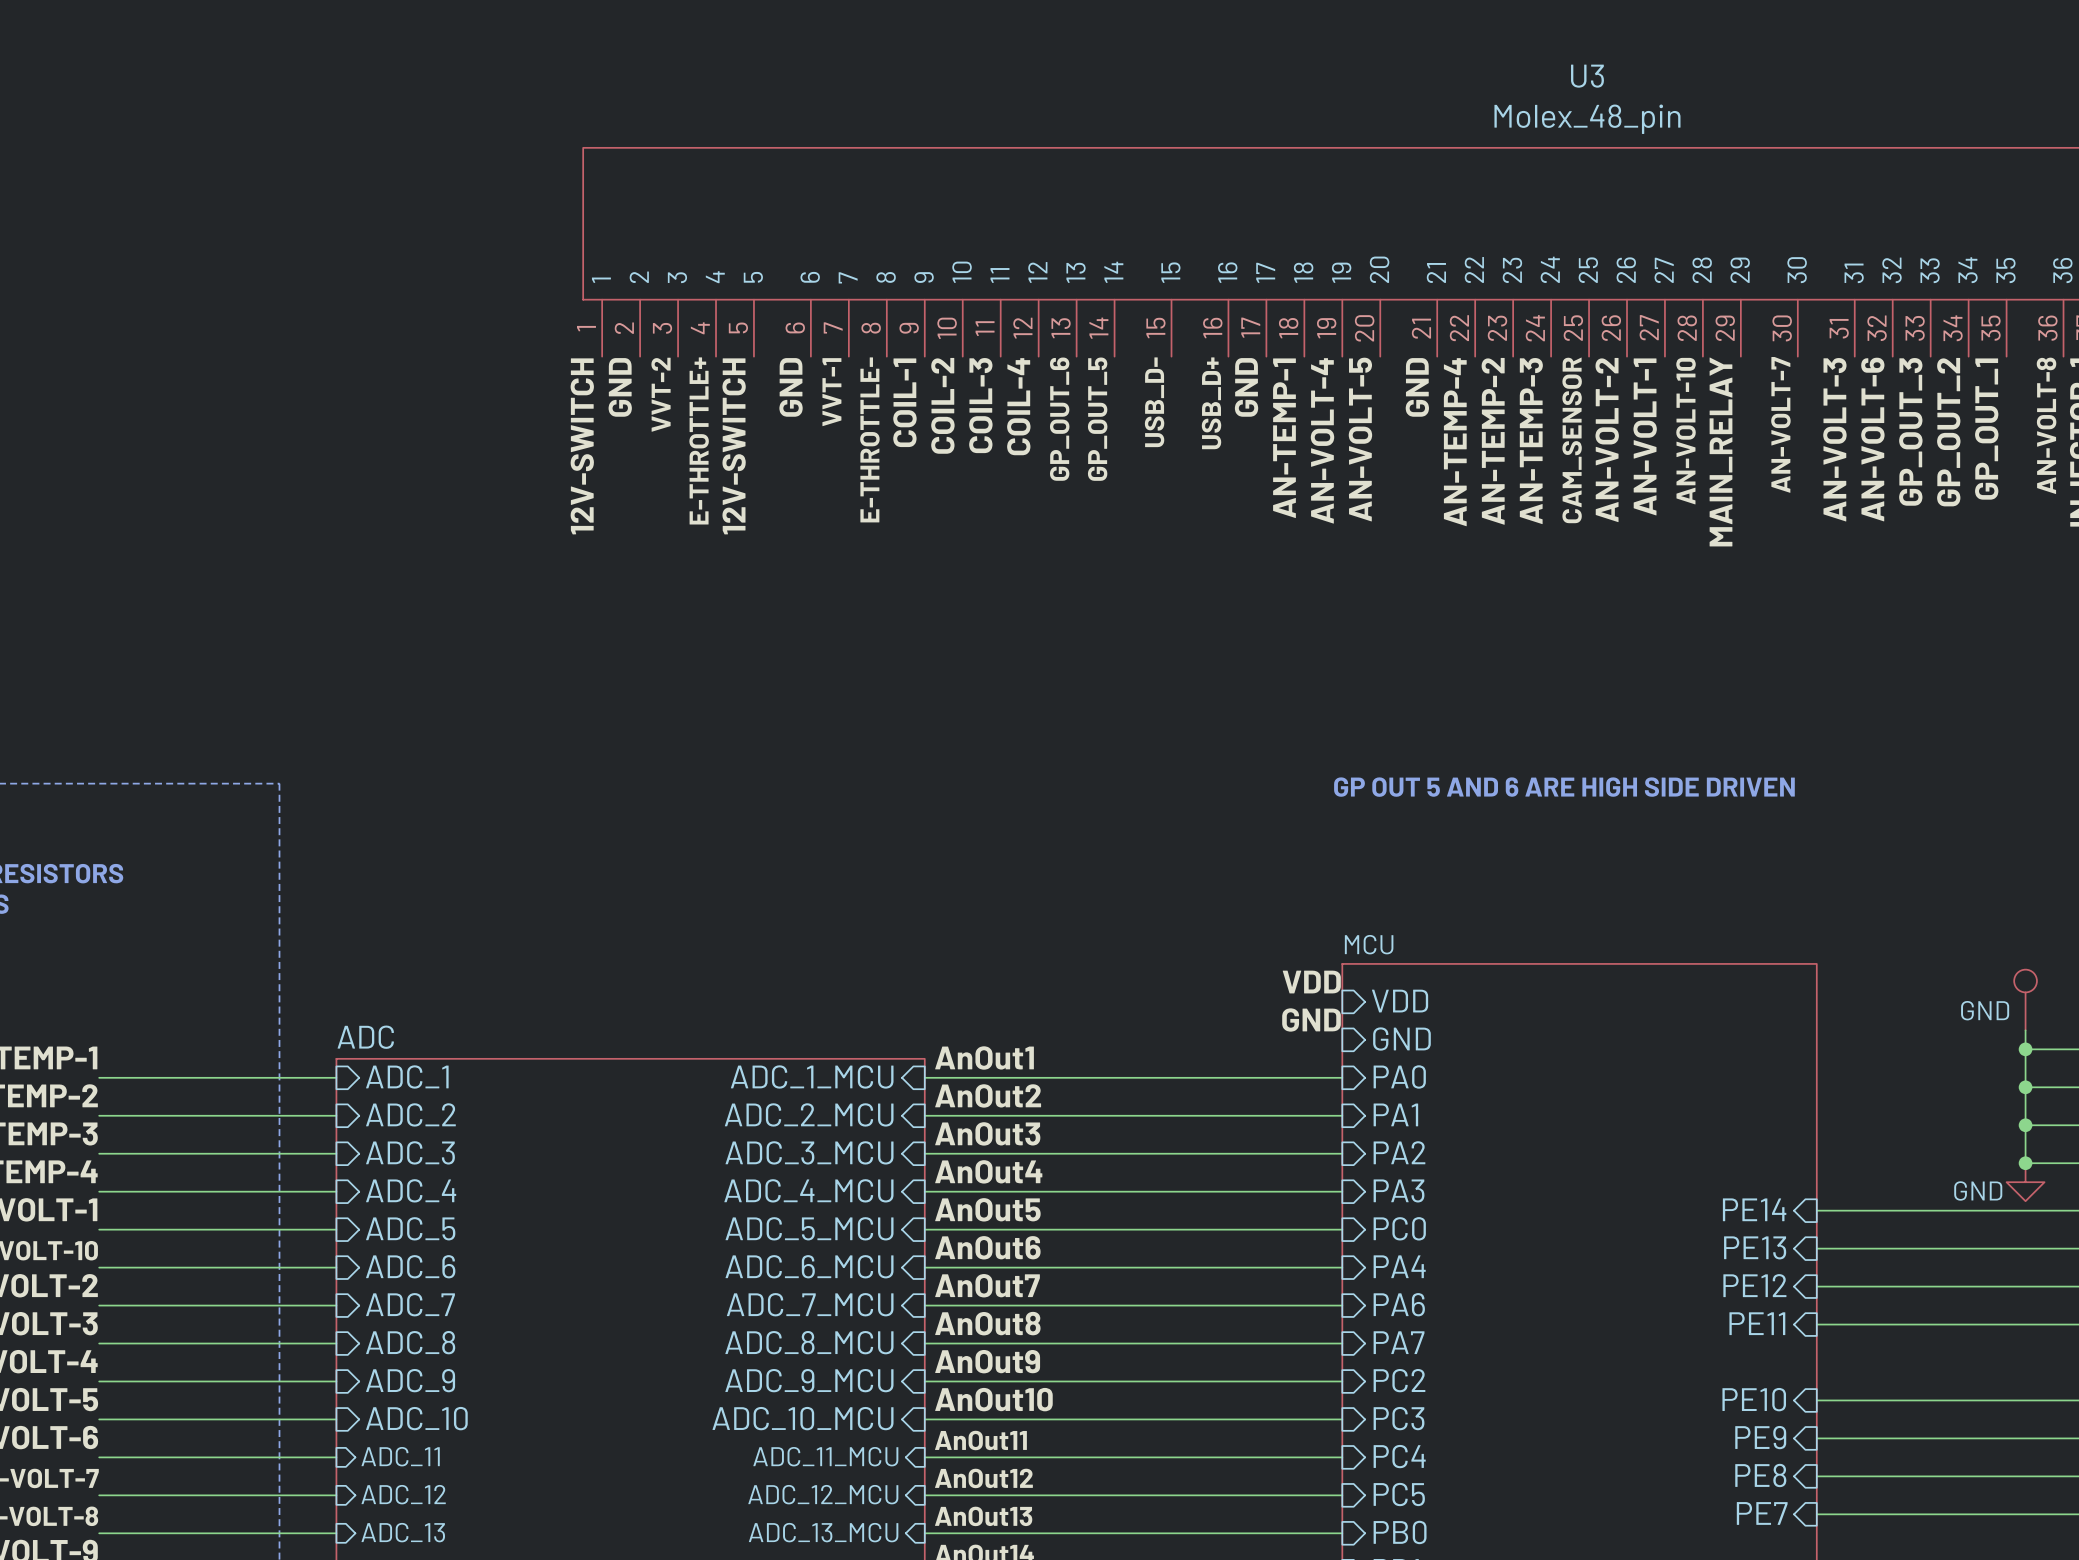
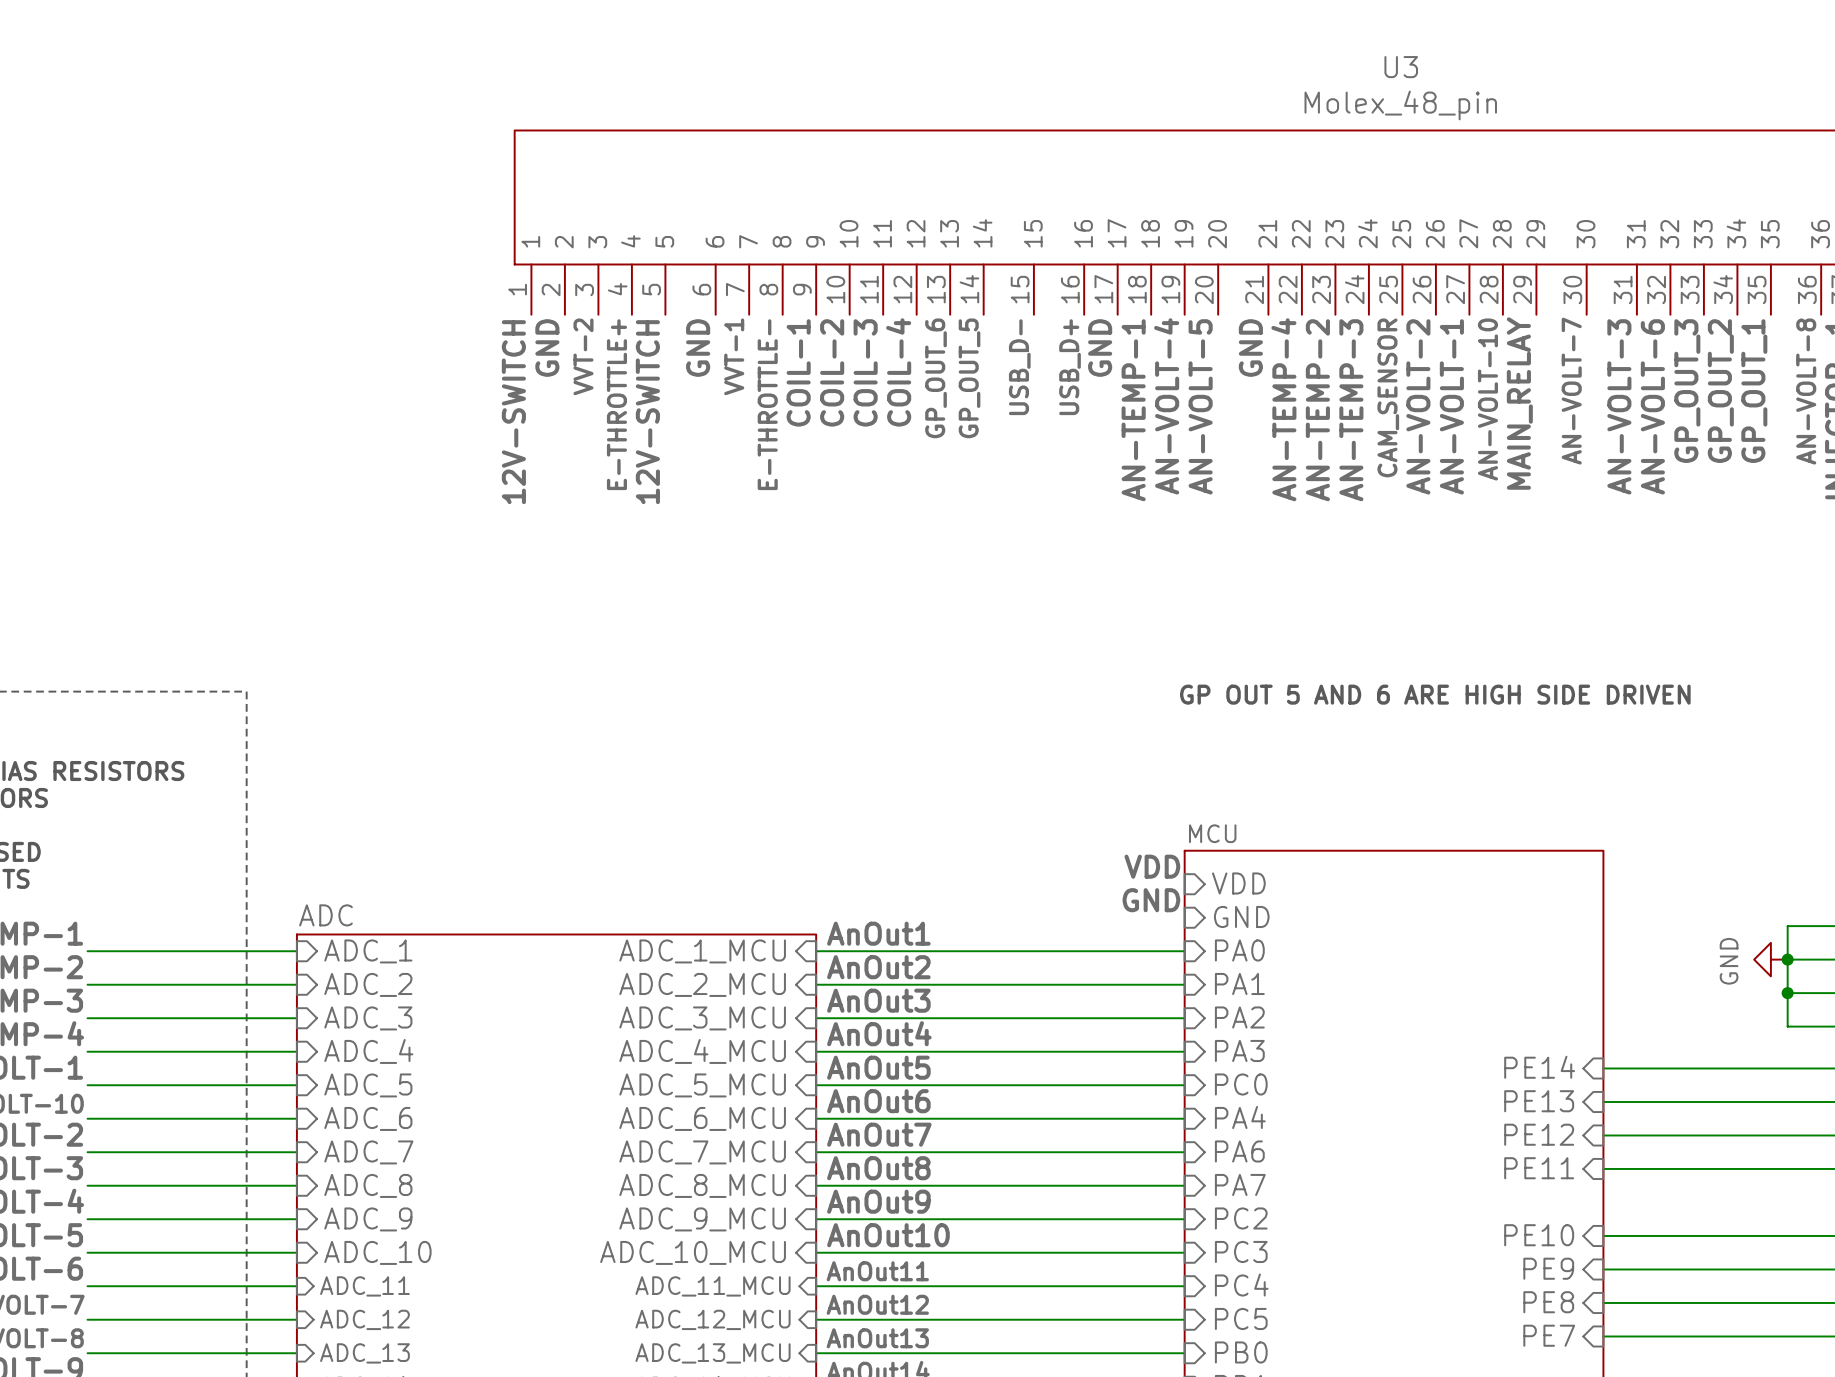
part: GND (2025, 1000) -> none
wire: (2025, 1030) (2025, 1049) -> none
junction: (2025, 1049) -> none
junction: (2025, 1163) -> none
power symbol rotation: 0° (2025, 1182) -> 90° clockwise (1770, 959)
power symbol position: GND (2025, 1182) -> GND (1770, 959)

